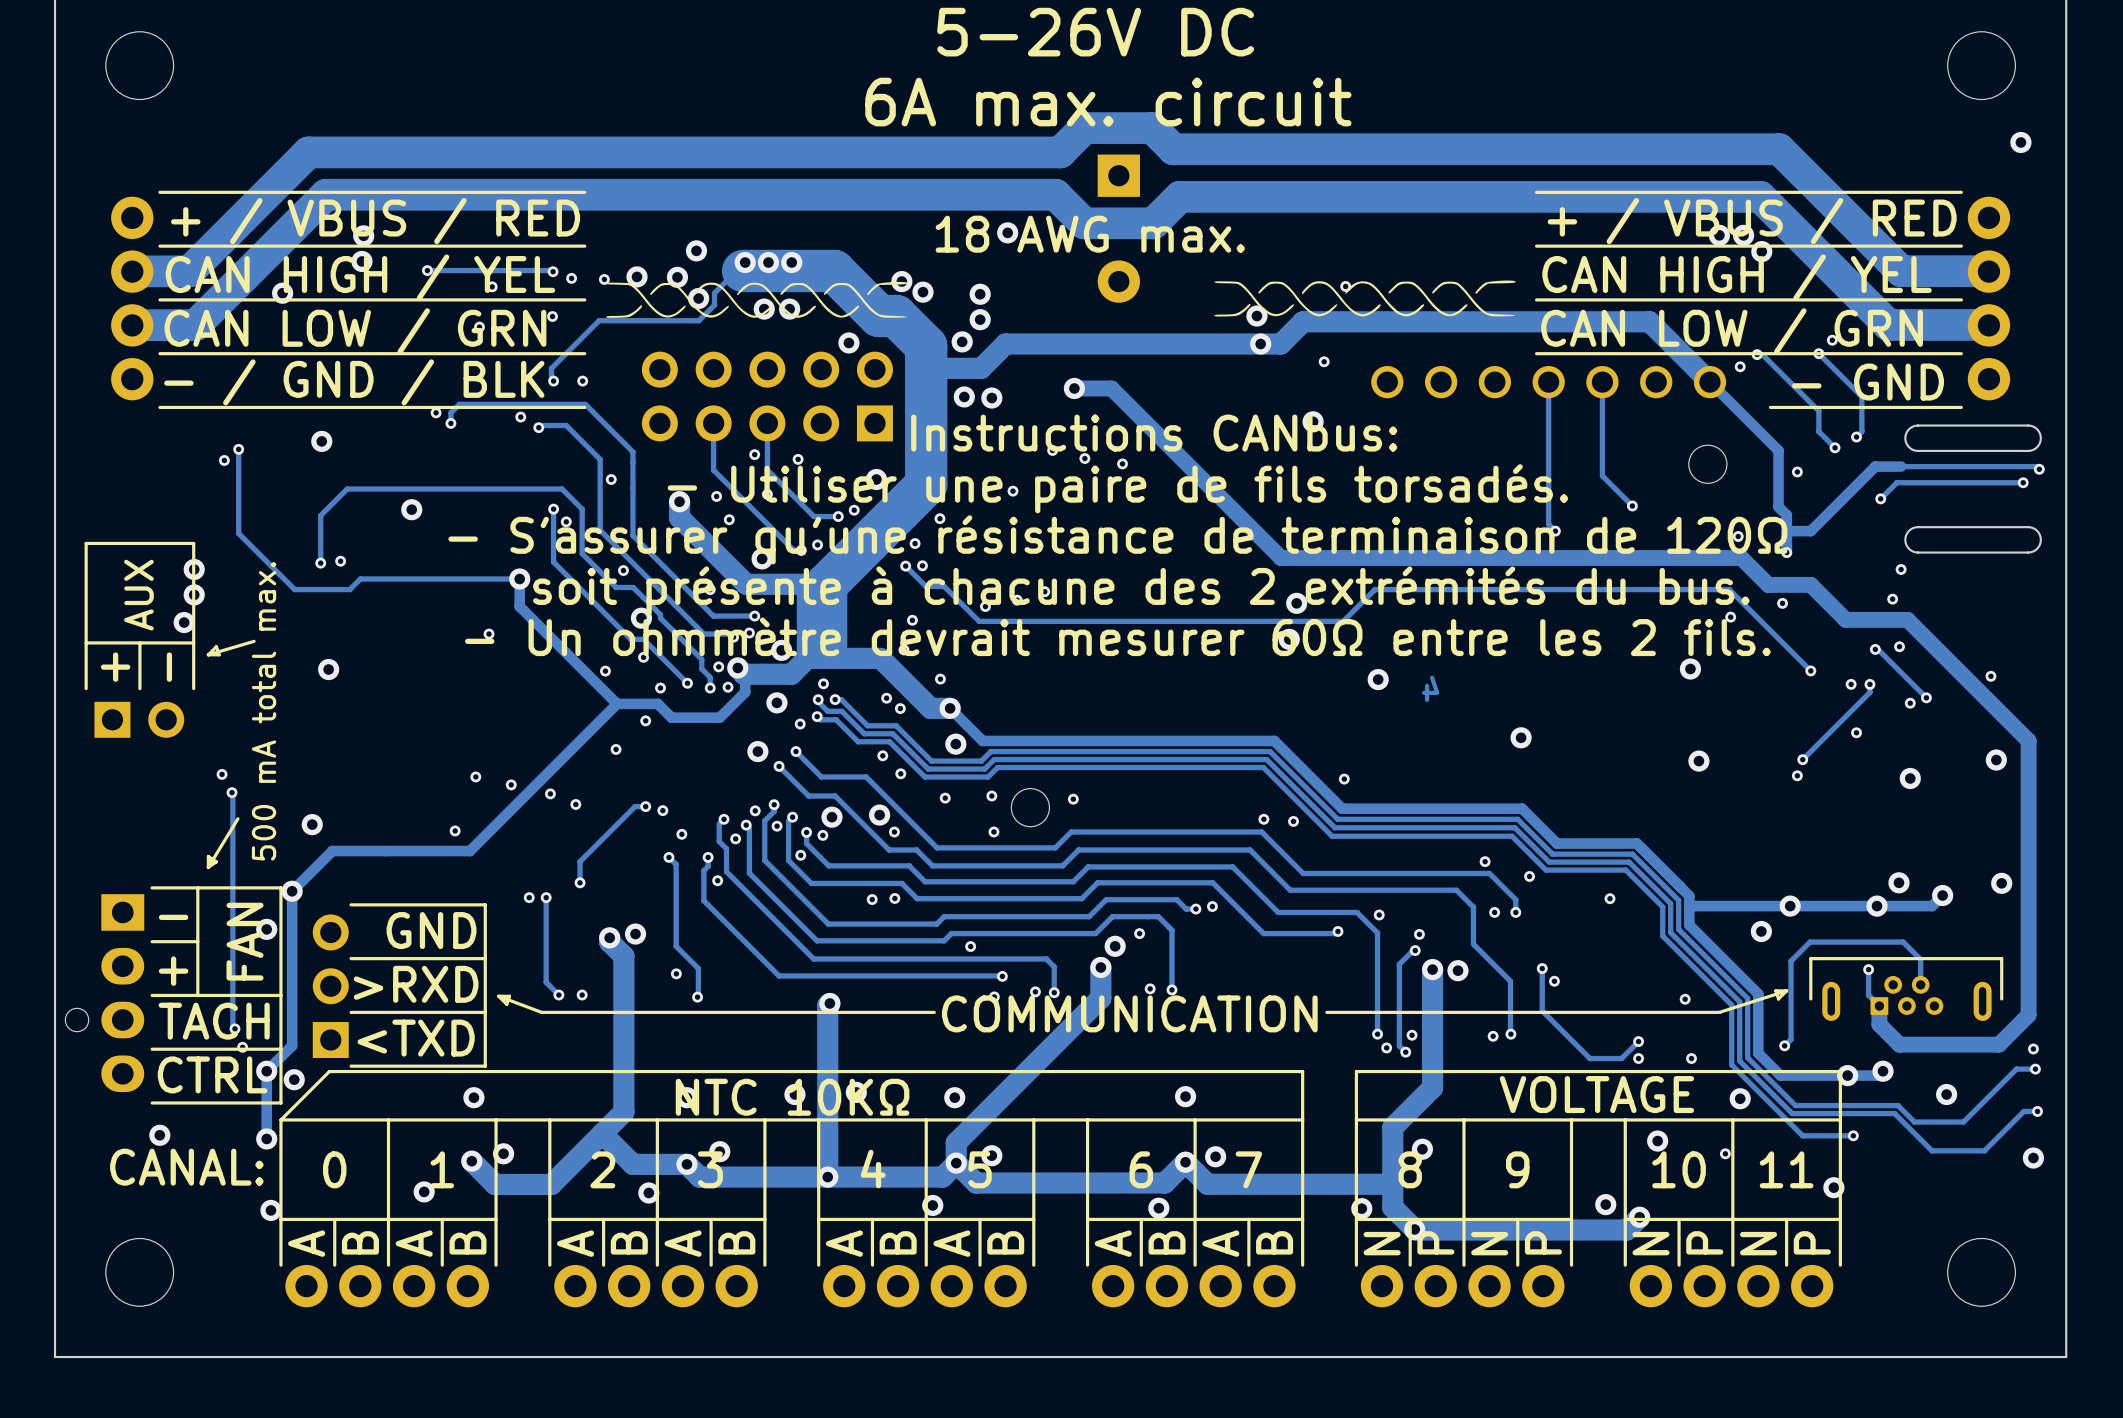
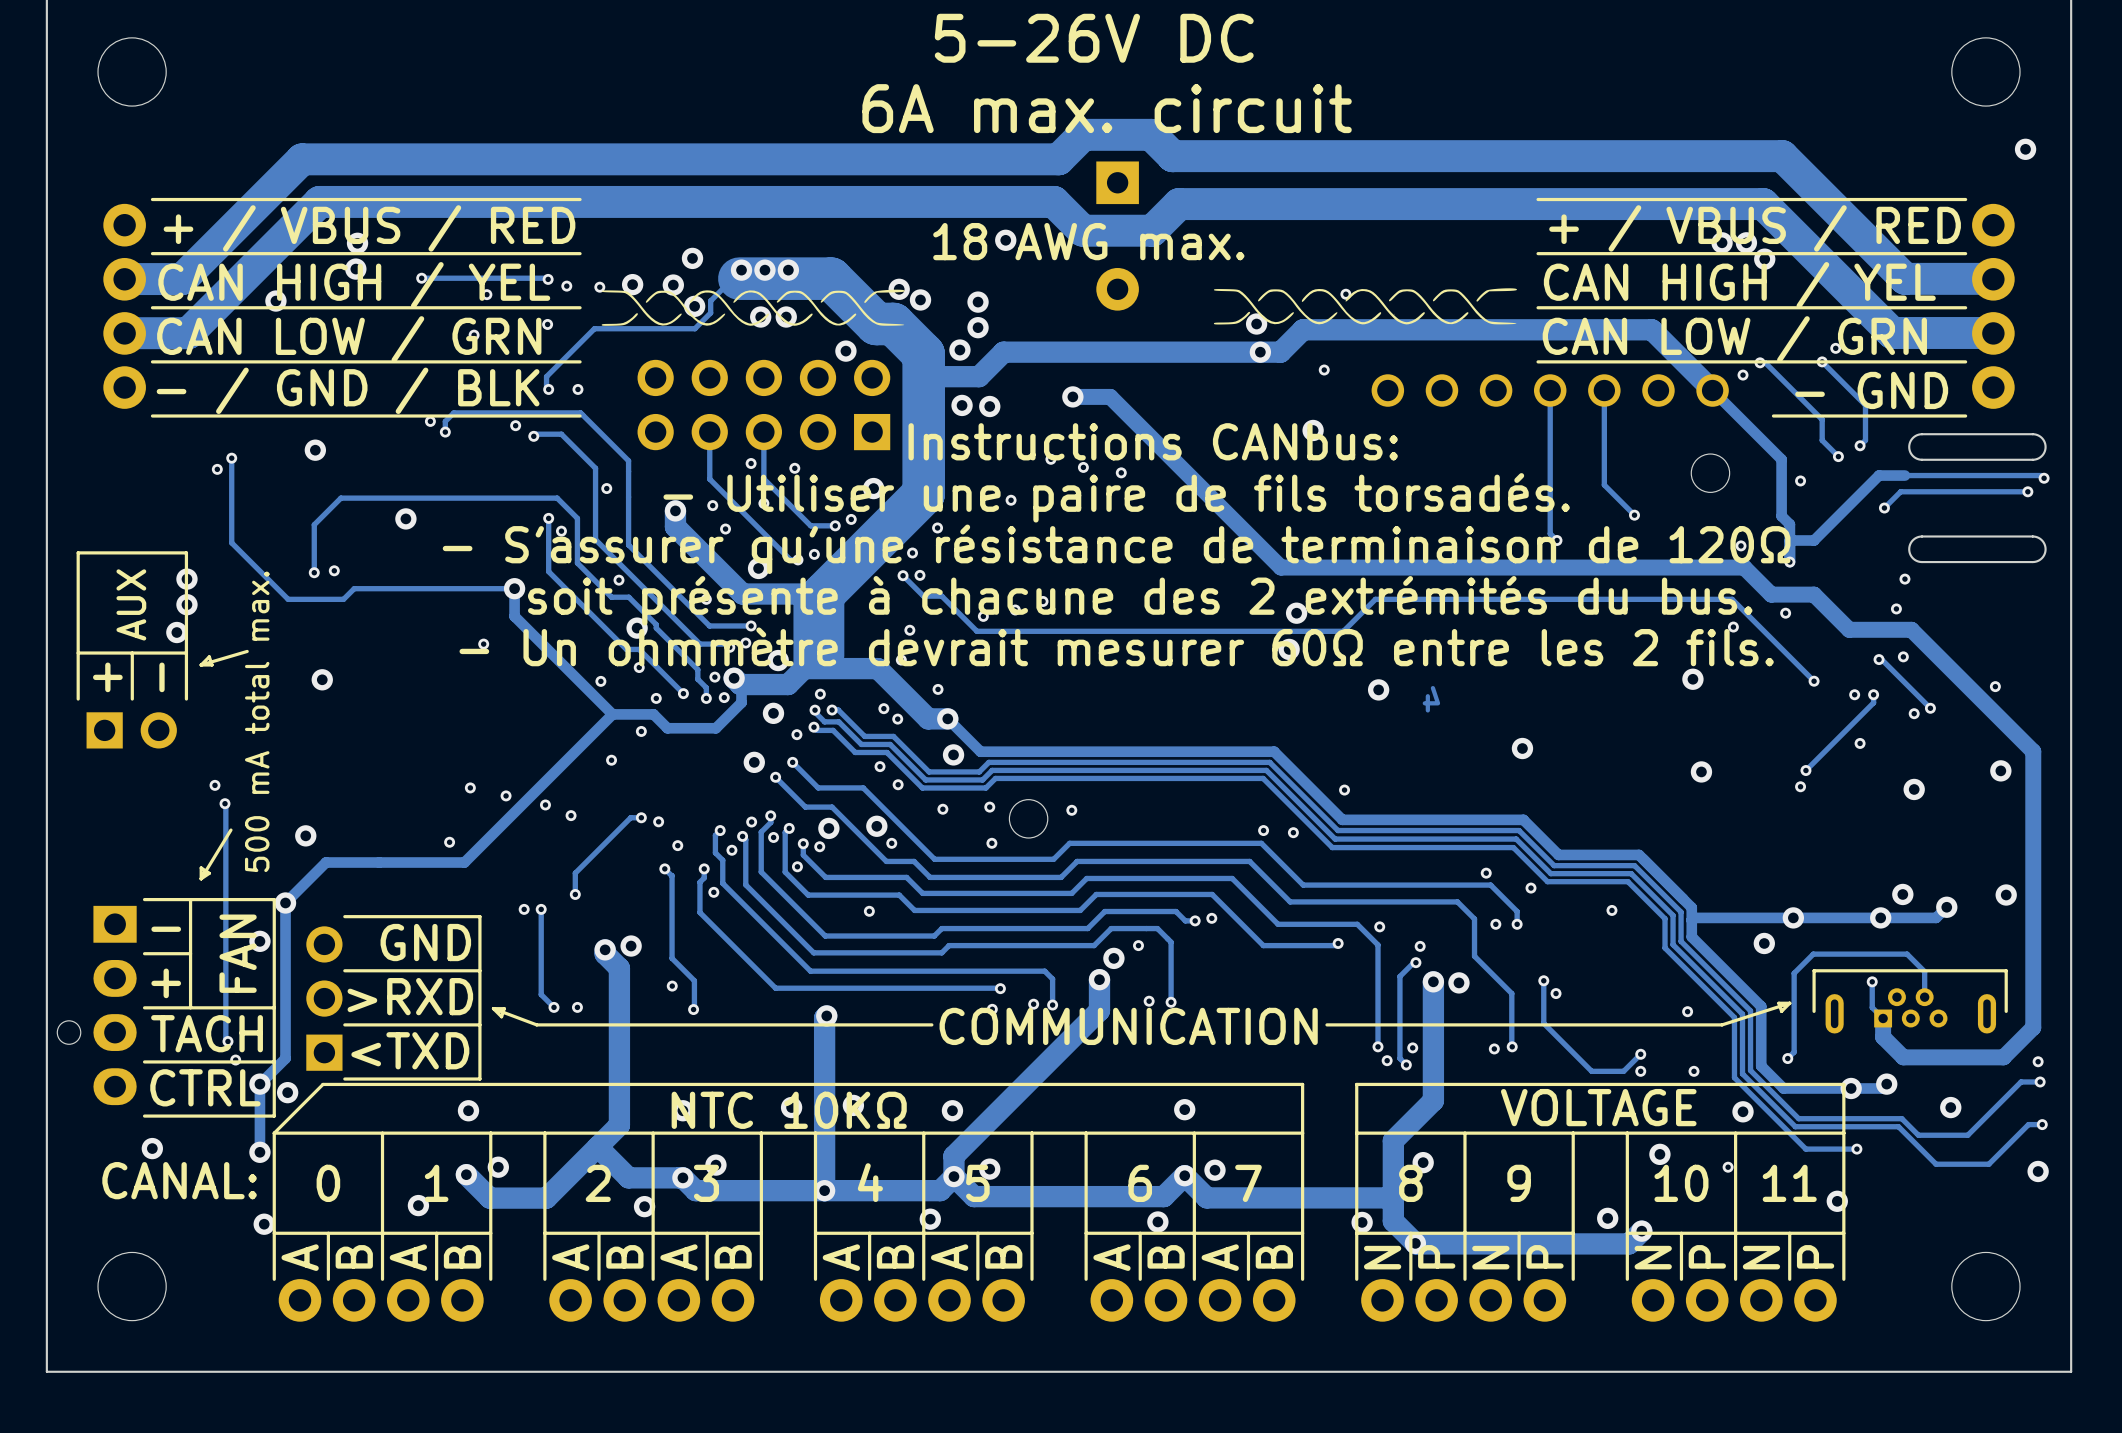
via: (894, 898) -> none
via: (970, 946) -> none

